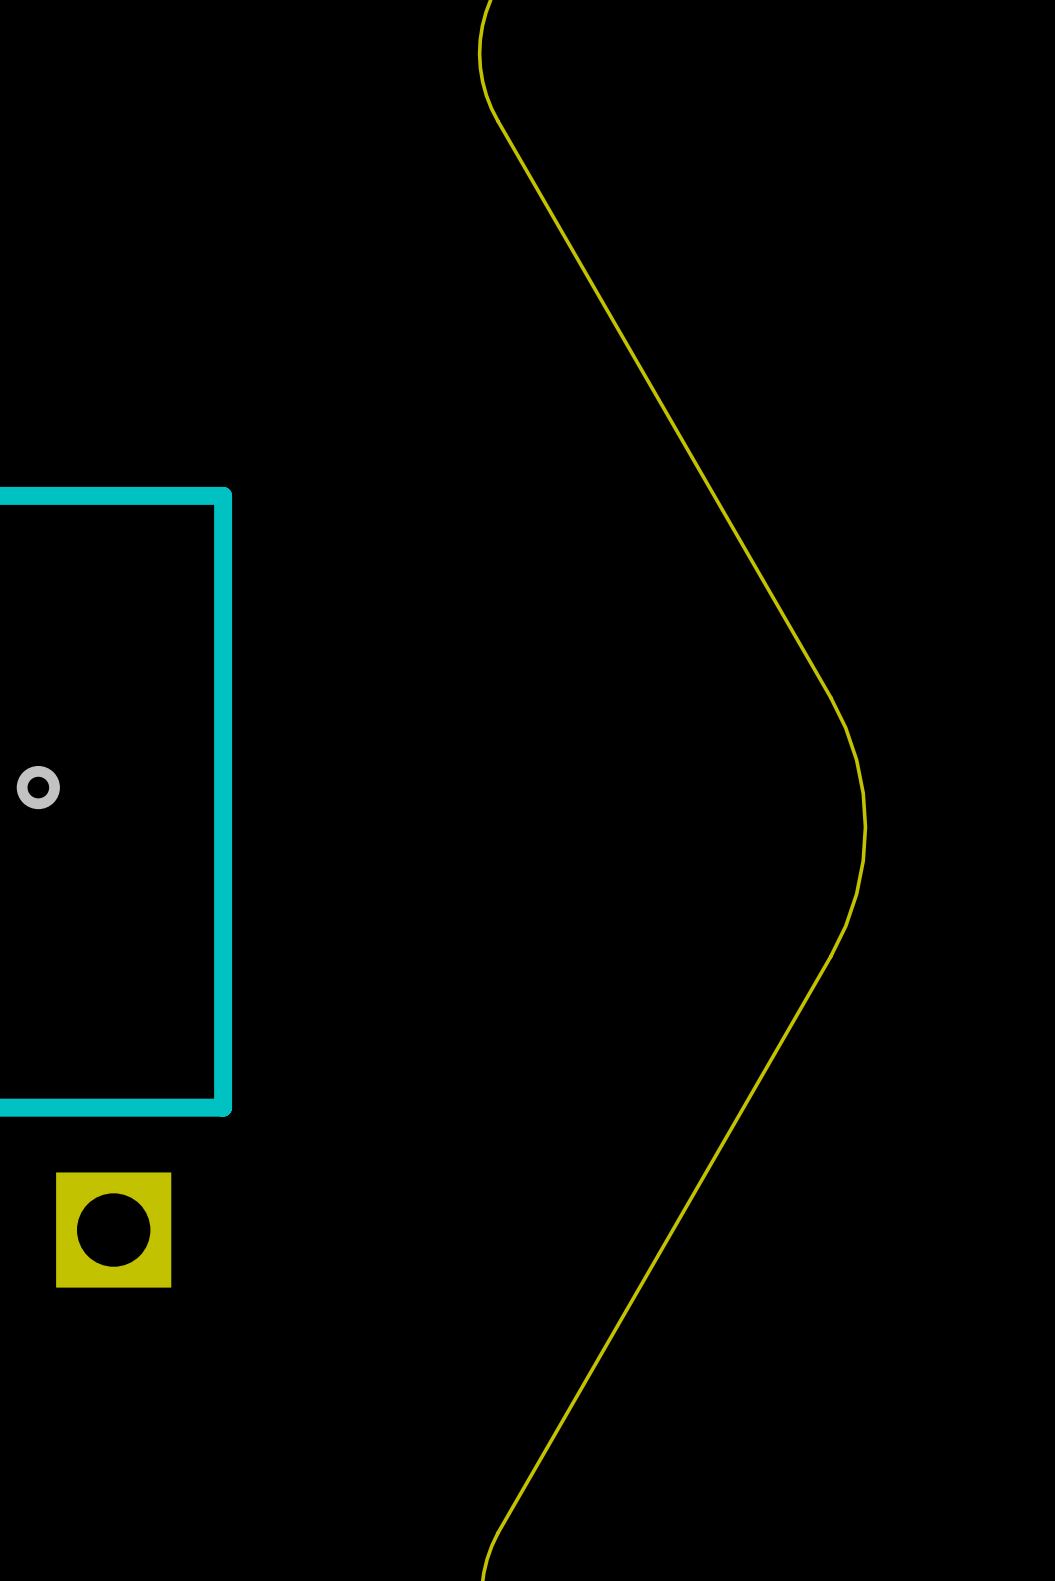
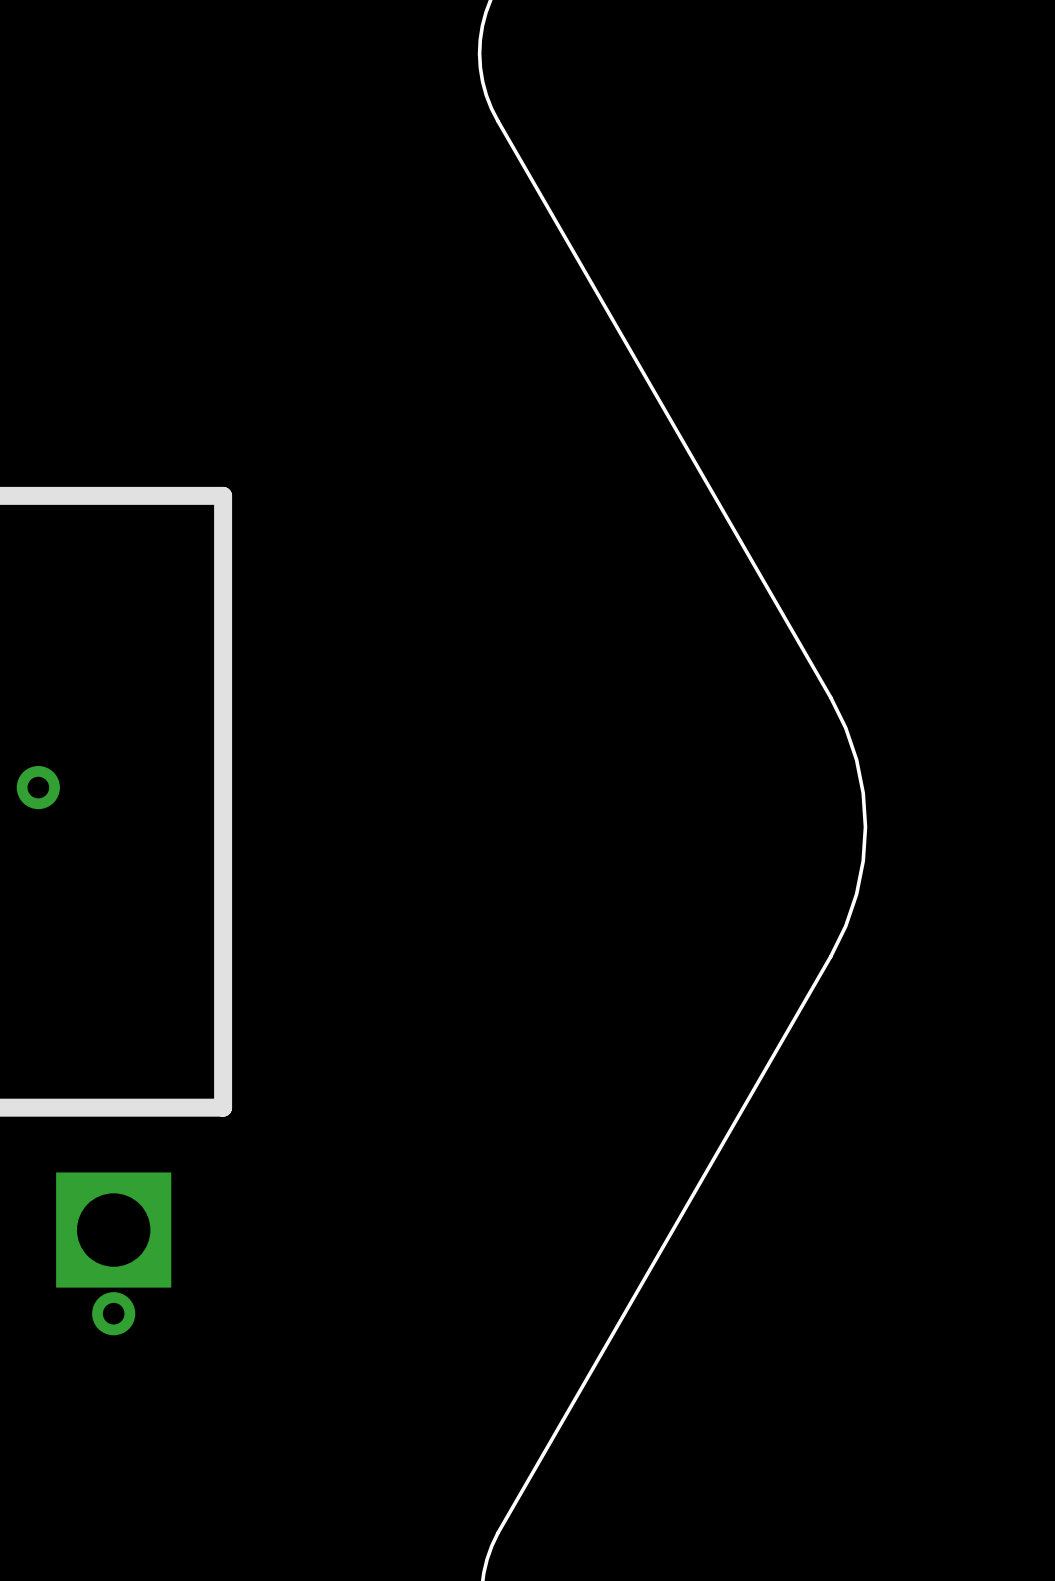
via: none -> (113, 1313)

